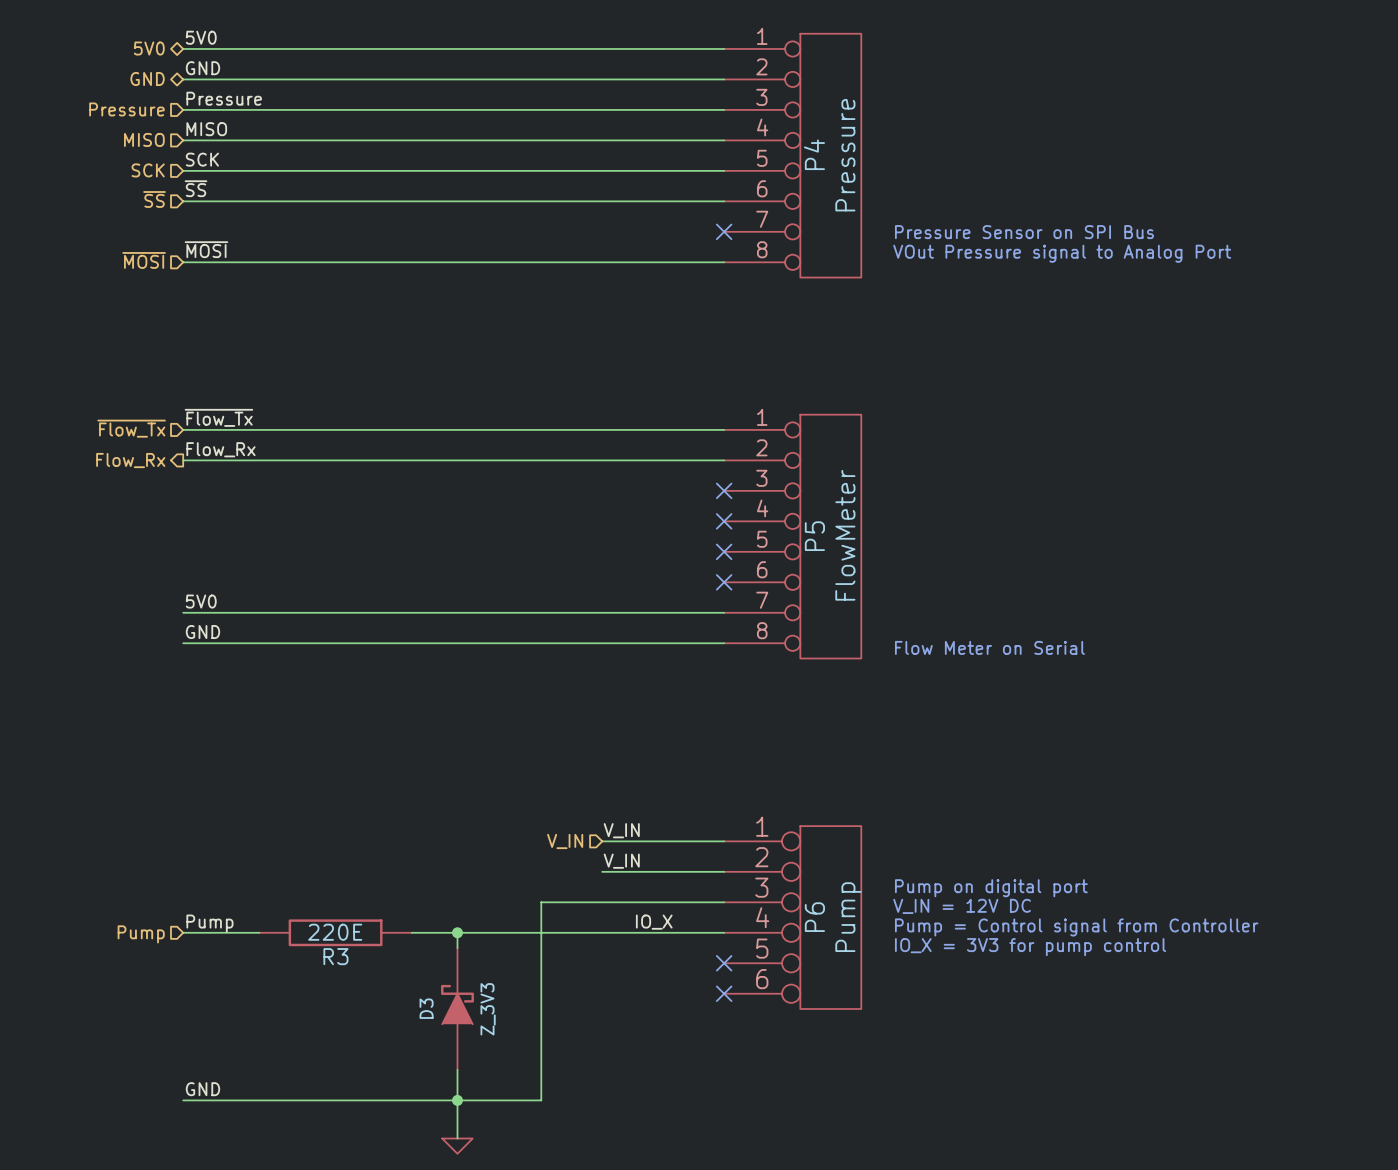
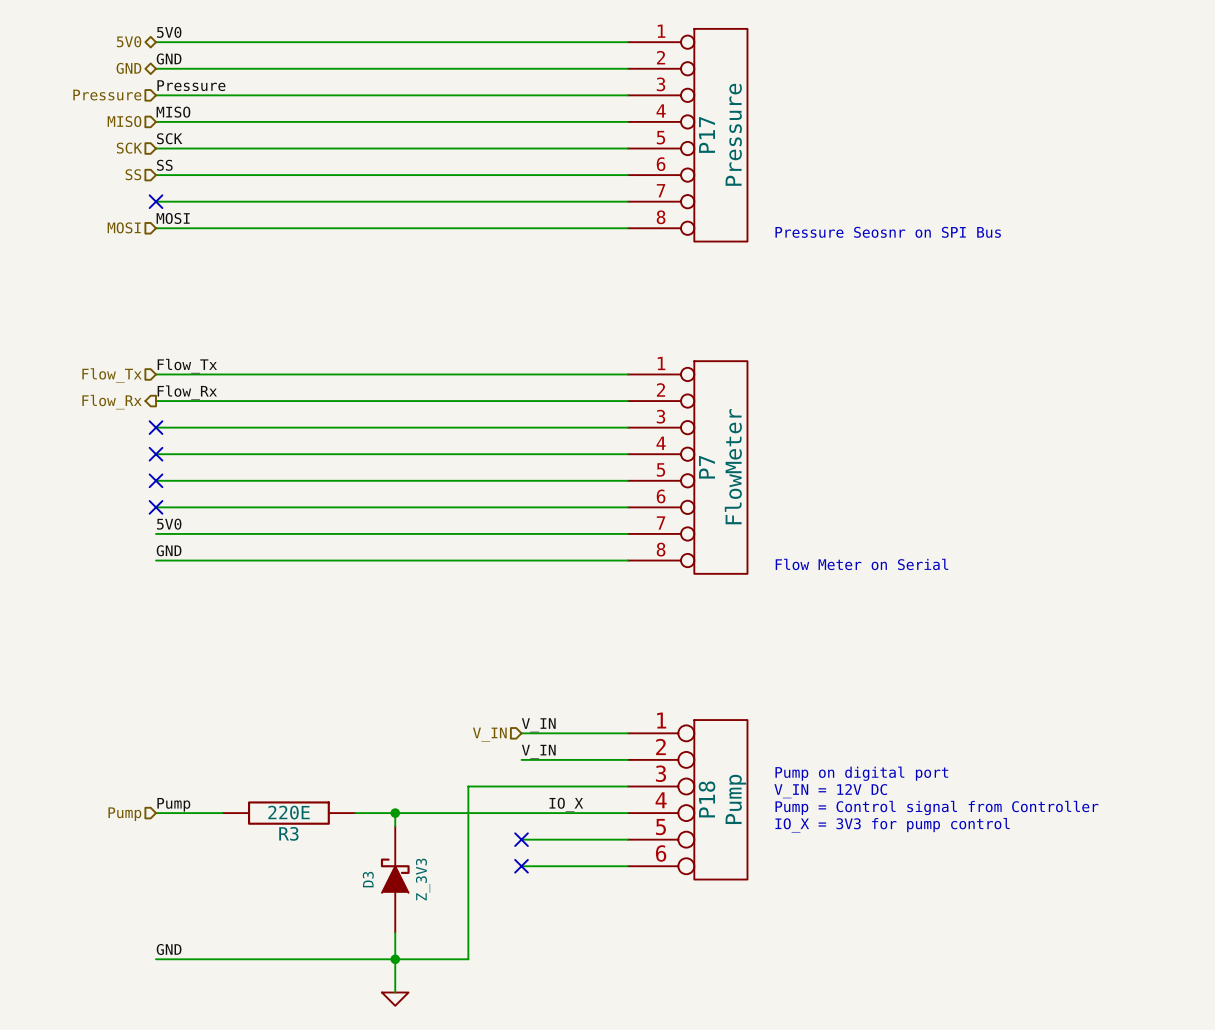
P4 name: P4 (814, 154) -> P17 (707, 134)
label: ~{SS} (196, 188) -> SS (164, 165)
hierarchical label: ~{SS} (154, 199) -> SS (133, 174)
wire: none -> (156, 201) (627, 201)
no-connect mark: none -> (156, 201)
no-connect mark: (724, 231) -> none
text: Pressure Sensor on SPI Bus (1024, 232) -> none
label: ~{MOSI} (206, 249) -> MOSI (173, 218)
text: VOut Pressure signal to Analog Port (1062, 253) -> none
hierarchical label: ~{MOSI} (144, 260) -> MOSI (124, 227)
text: none -> Pressure Seosnr on SPI Bus (888, 232)
label: ~{Flow_Tx} (218, 417) -> Flow_Tx (187, 366)
hierarchical label: ~{Flow_Tx} (131, 428) -> Flow_Tx (112, 375)
wire: none -> (156, 427) (627, 427)
no-connect mark: none -> (156, 427)
no-connect mark: (724, 490) -> none
wire: none -> (156, 454) (627, 454)
no-connect mark: none -> (156, 454)
no-connect mark: (724, 521) -> none
P5 name: P5 (814, 536) -> P7 (707, 467)
wire: none -> (156, 480) (627, 480)
no-connect mark: none -> (156, 480)
no-connect mark: (724, 551) -> none
wire: none -> (156, 507) (627, 507)
no-connect mark: none -> (156, 507)
no-connect mark: (724, 582) -> none
P6 name: P6 (814, 917) -> P18 (707, 799)
wire: none -> (521, 839) (627, 839)
no-connect mark: none -> (521, 839)
no-connect mark: (724, 963) -> none
wire: none -> (521, 866) (627, 866)
no-connect mark: none -> (521, 866)
no-connect mark: (724, 993) -> none

